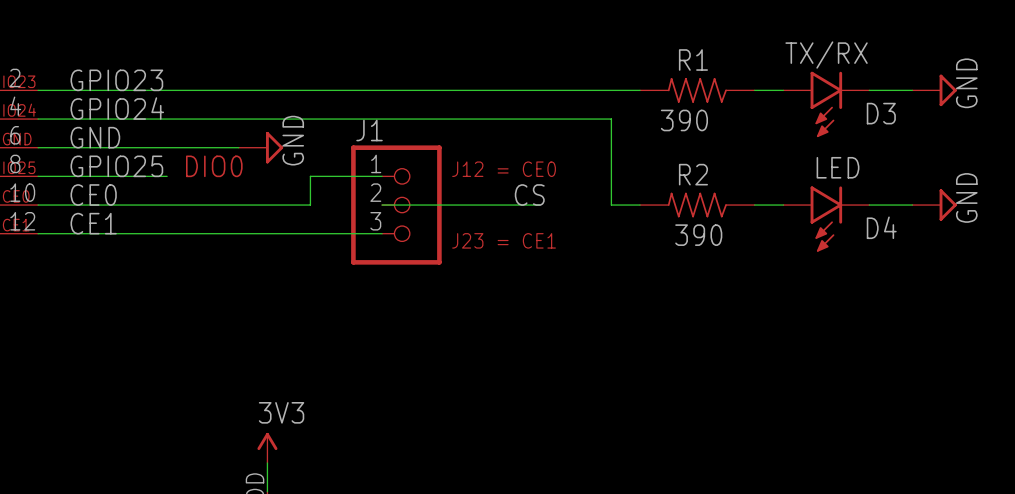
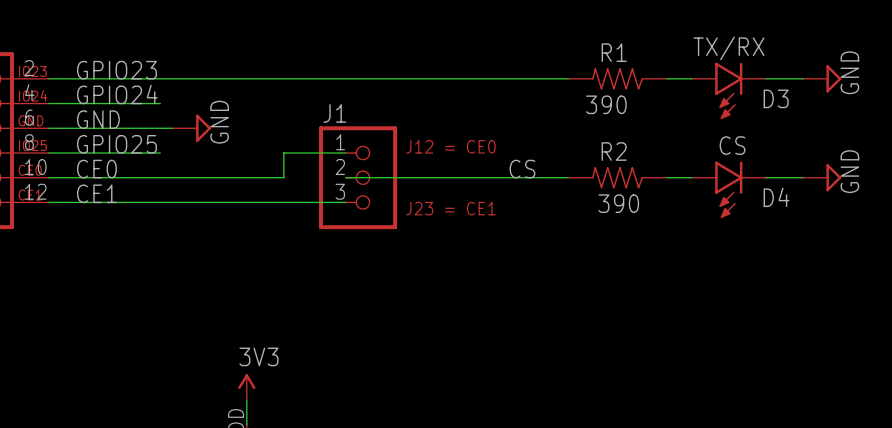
wire: (167, 119) (611, 119) (611, 205) -> (481, 177) (543, 177)
power symbol position: GND (260, 147) -> GND (191, 128)
text: DIO0 (214, 166) -> none
D4 value: LED (838, 167) -> CS (732, 145)
text position: CS (529, 195) -> CS (522, 169)

